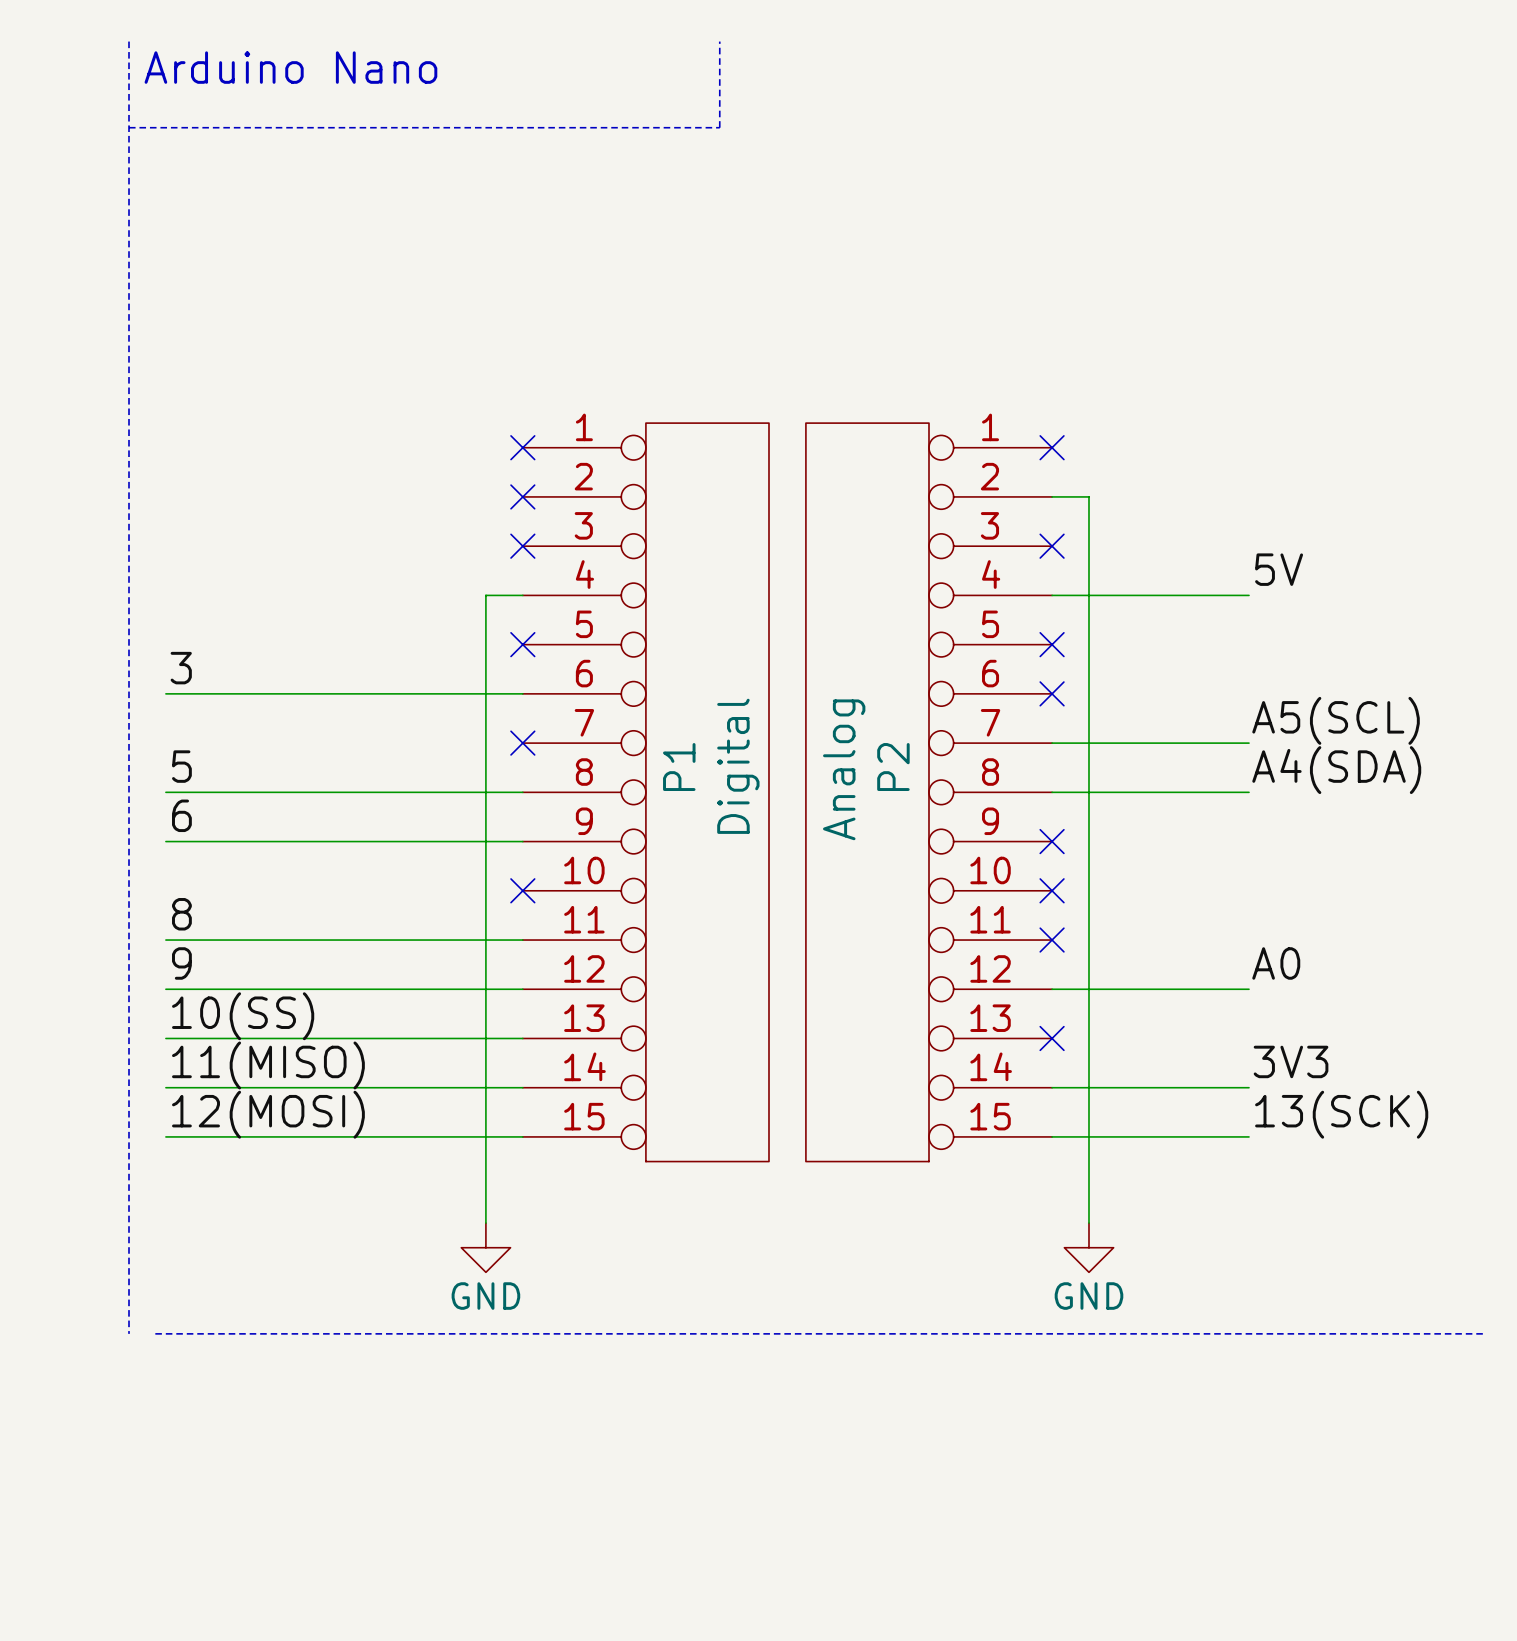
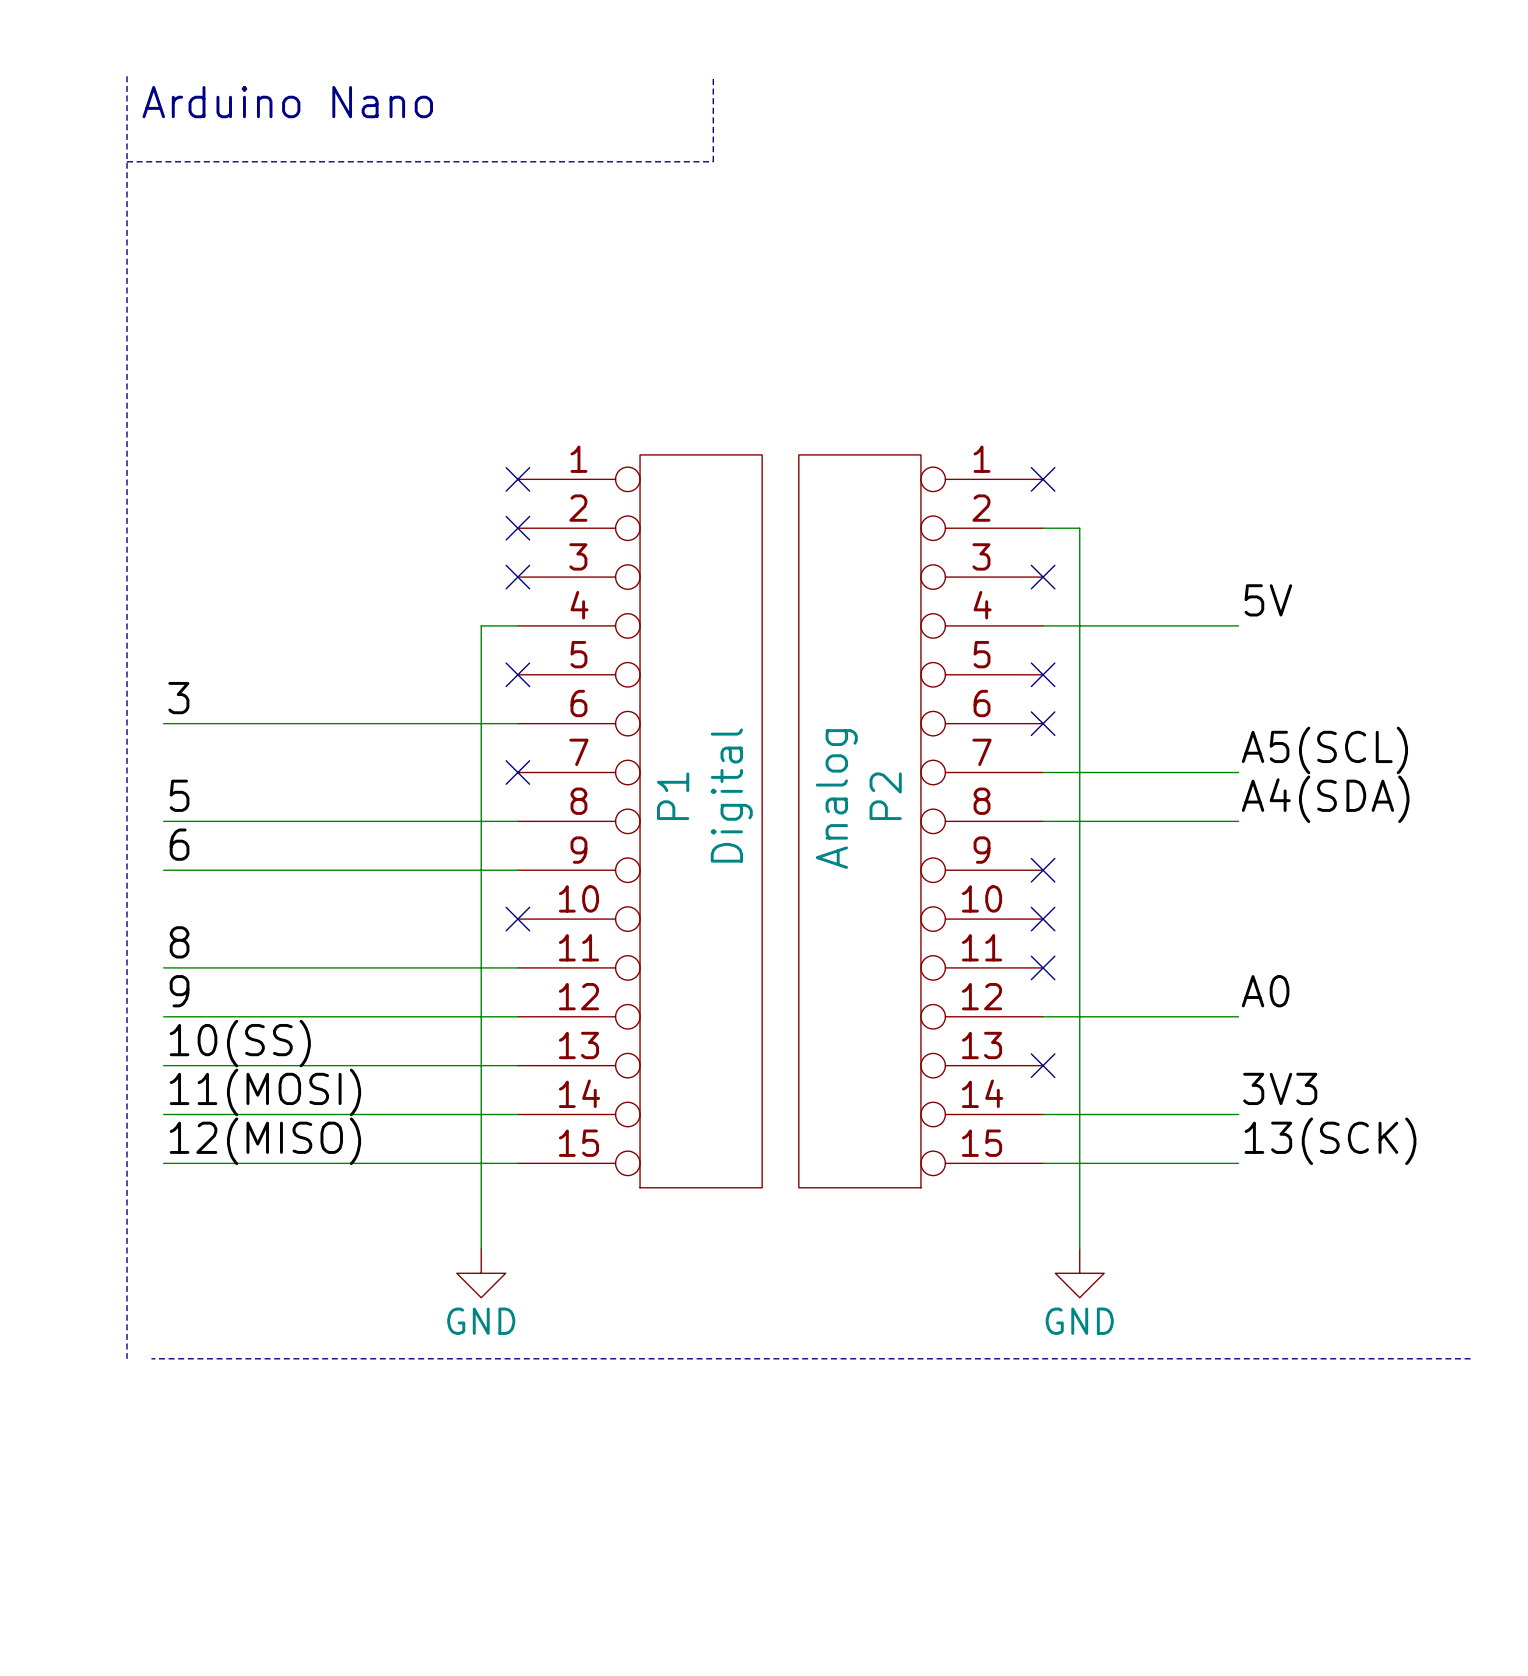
label: 11(MISO) (268, 1065) -> 11(MOSI) (265, 1092)
label: 12(MOSI) (268, 1114) -> 12(MISO) (265, 1141)

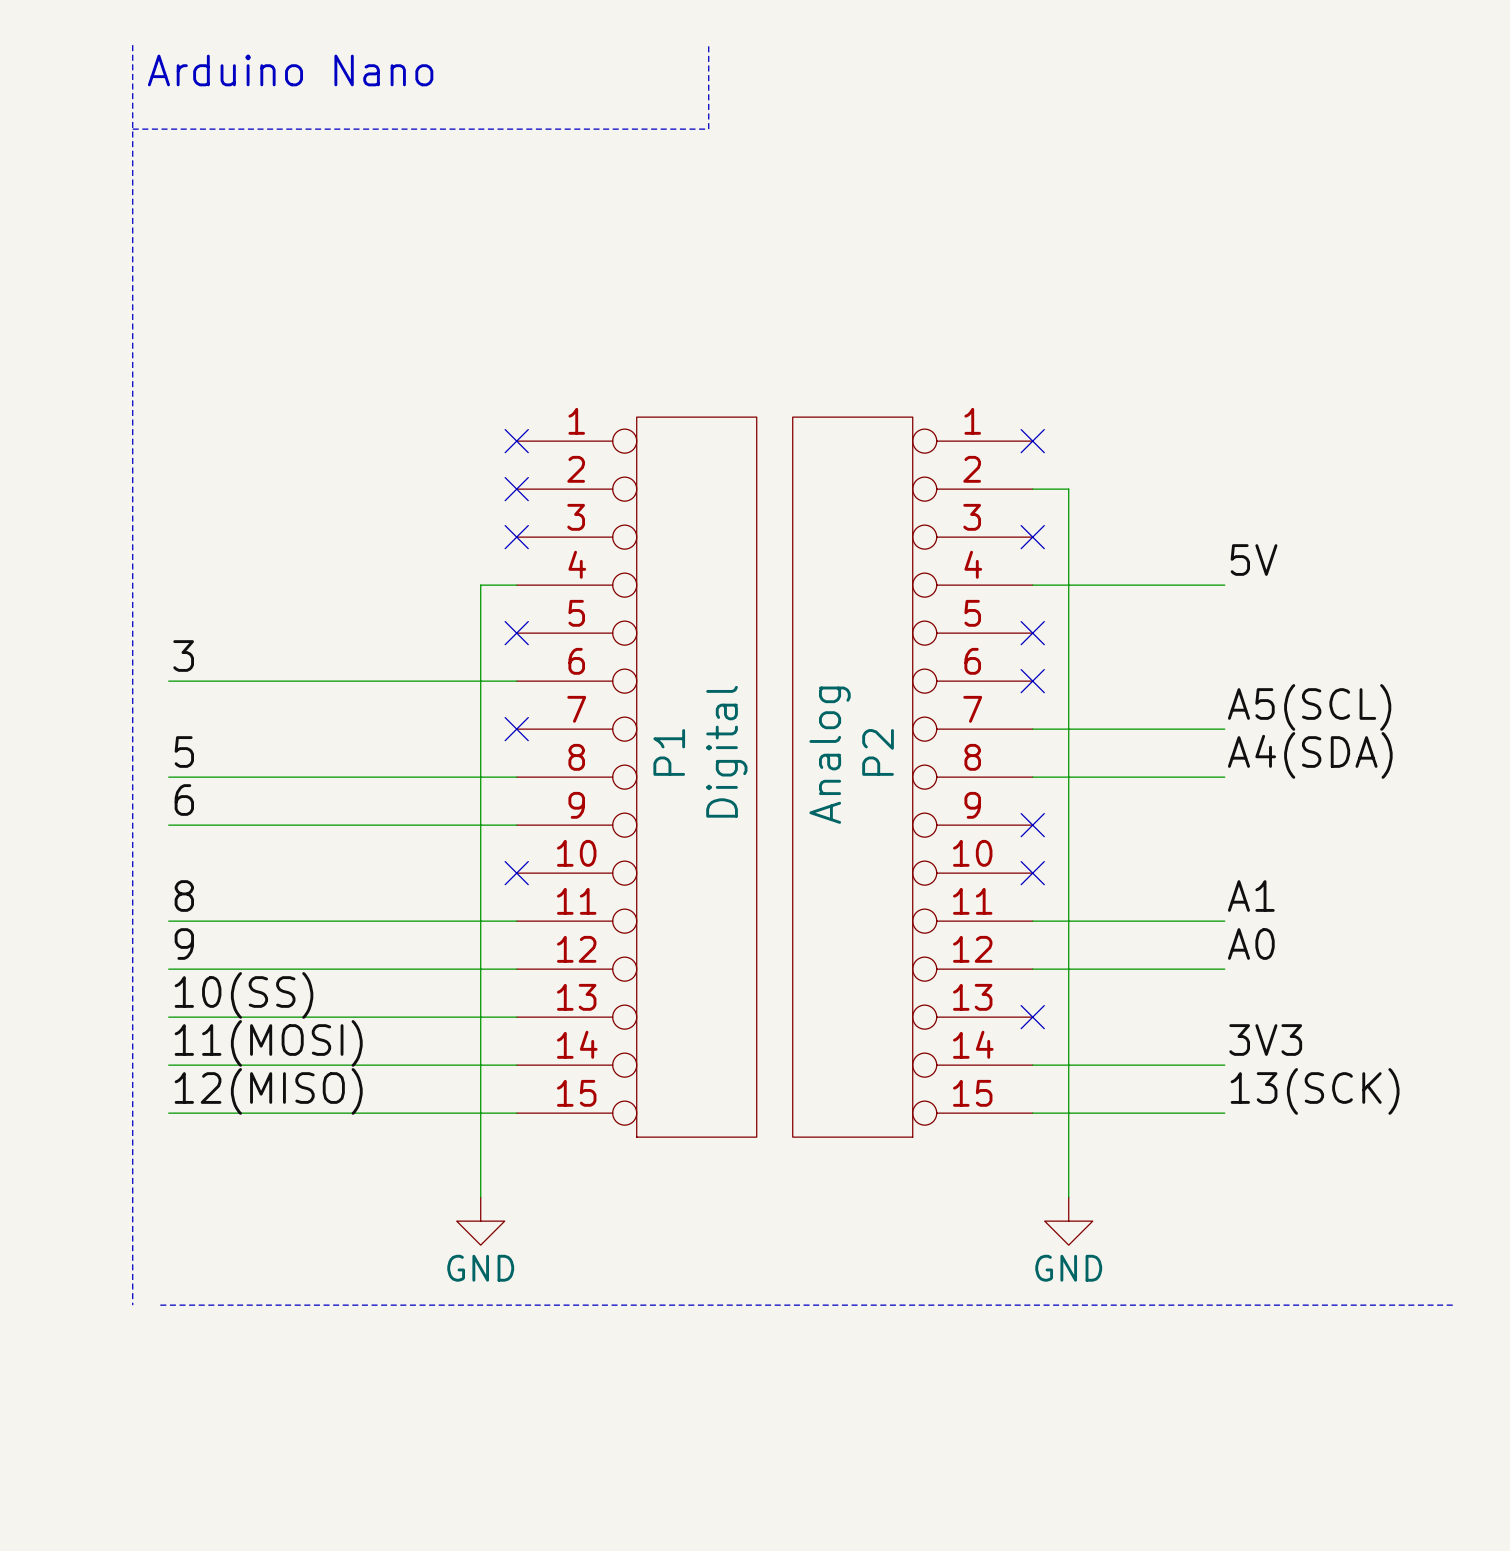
label: none -> A1 (1251, 896)
wire: none -> (1032, 921) (1224, 921)
no-connect mark: (1043, 967) -> none

